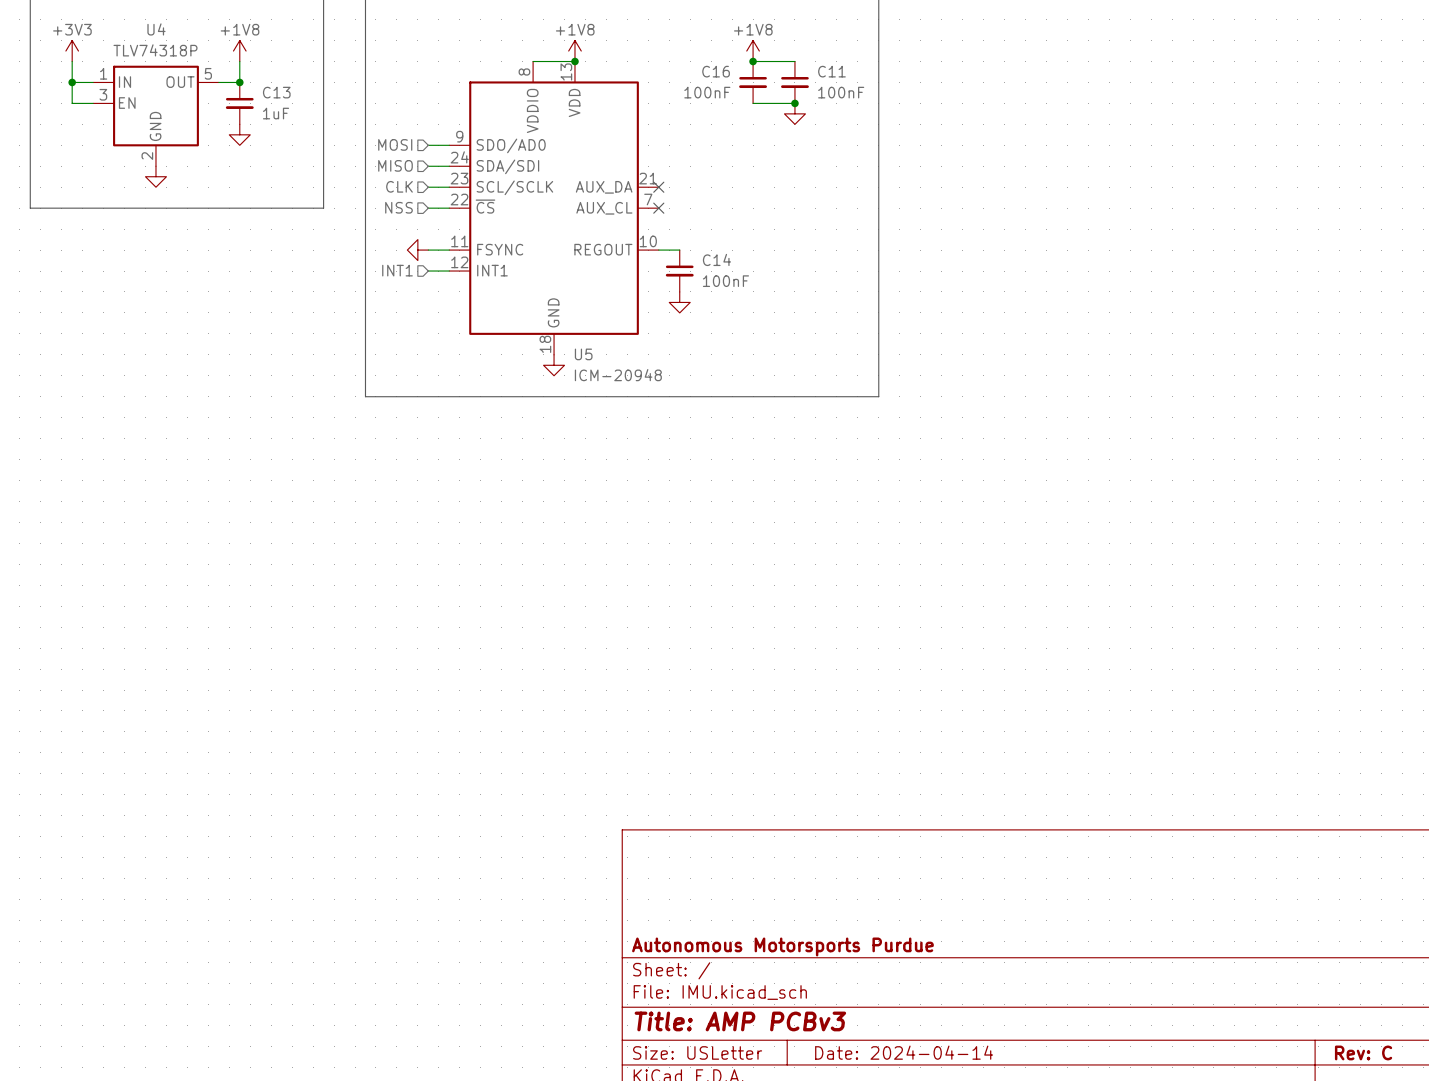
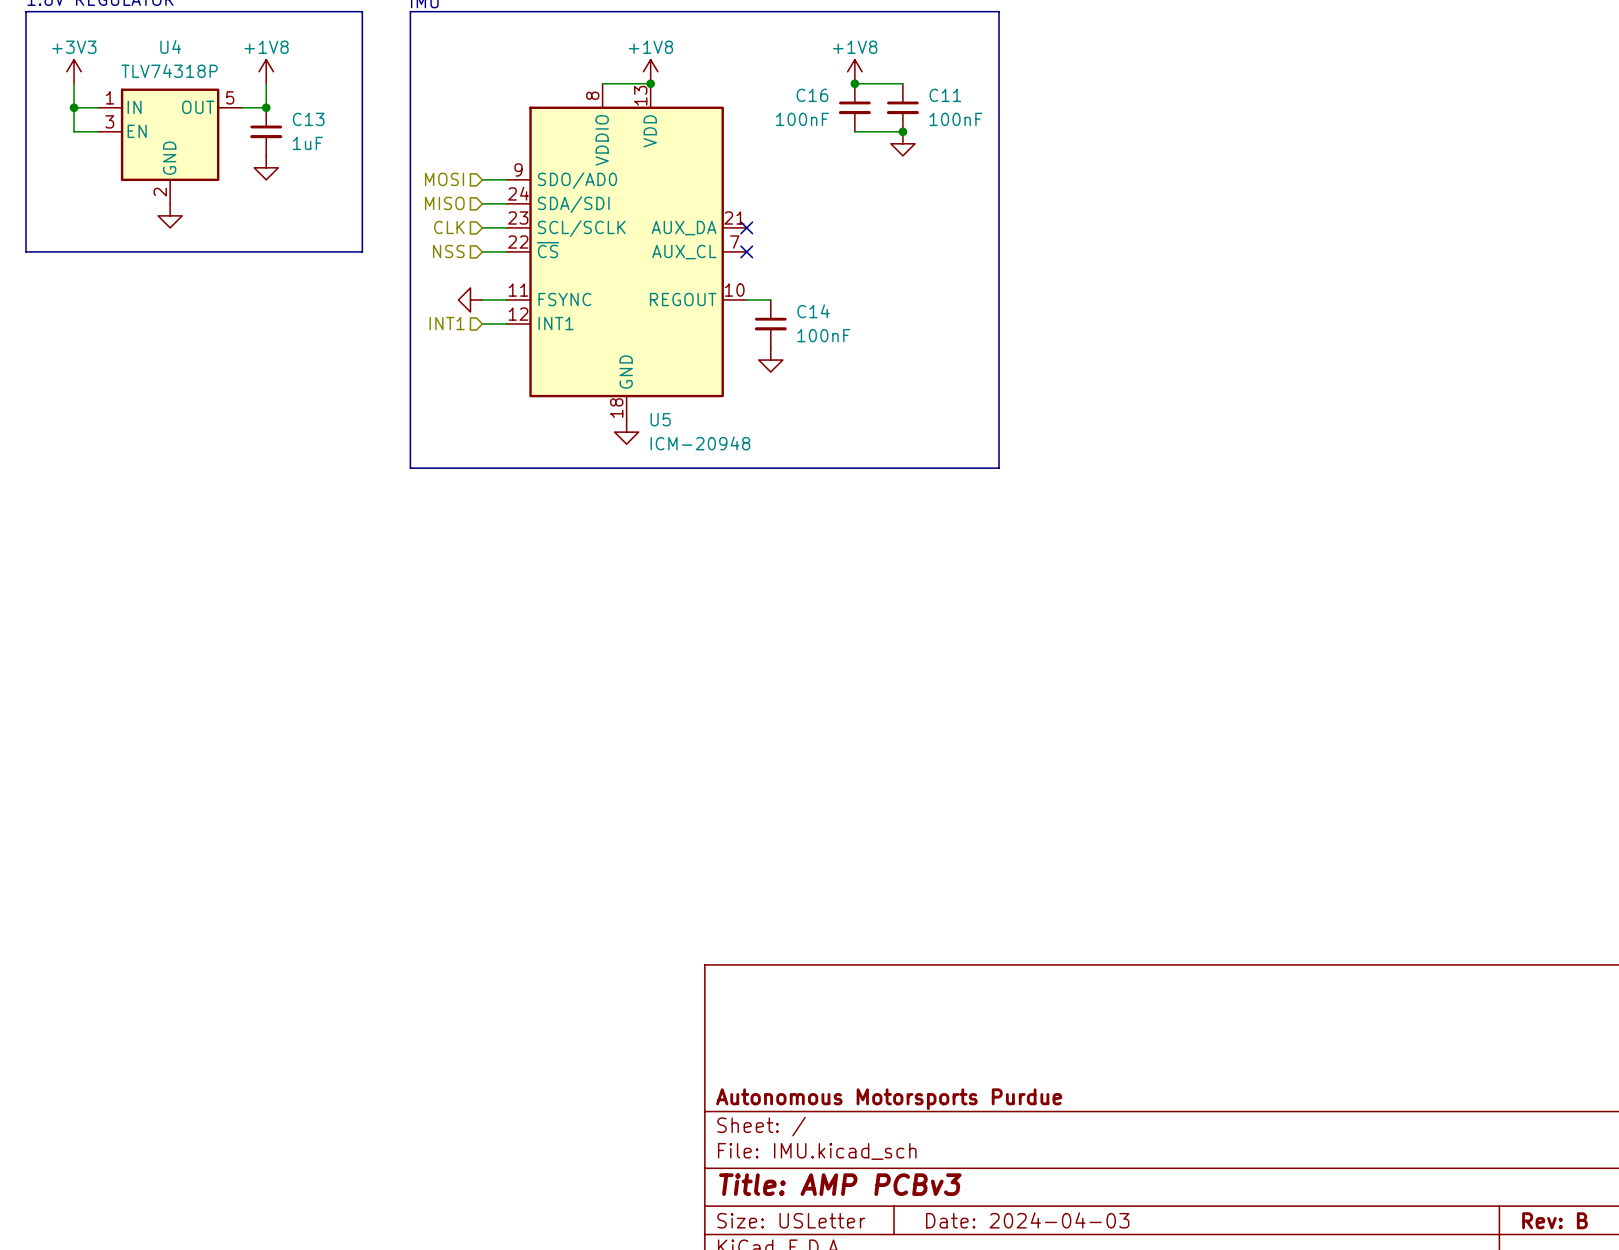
title block: Date: 2024-04-14 (904, 1052) -> Date: 2024-04-03 (1027, 1220)
title block: Rev: C (1363, 1052) -> Rev: B (1554, 1220)

